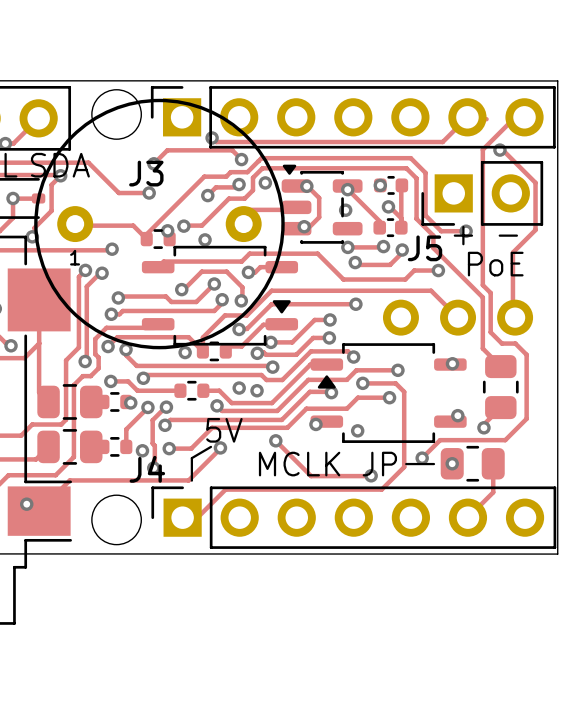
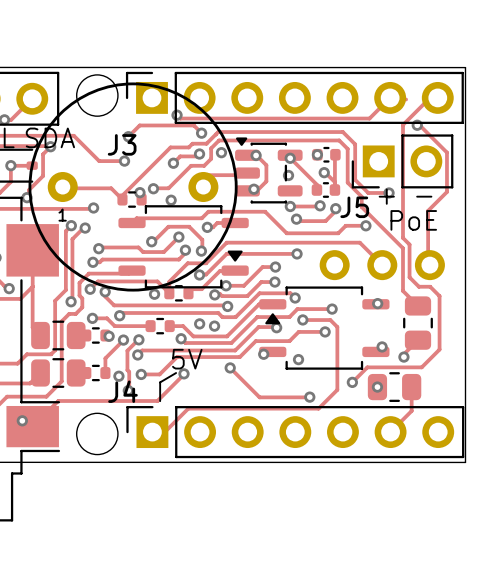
text: MCLK JP (327, 464) -> none
line: (406, 464) (433, 464) -> none

